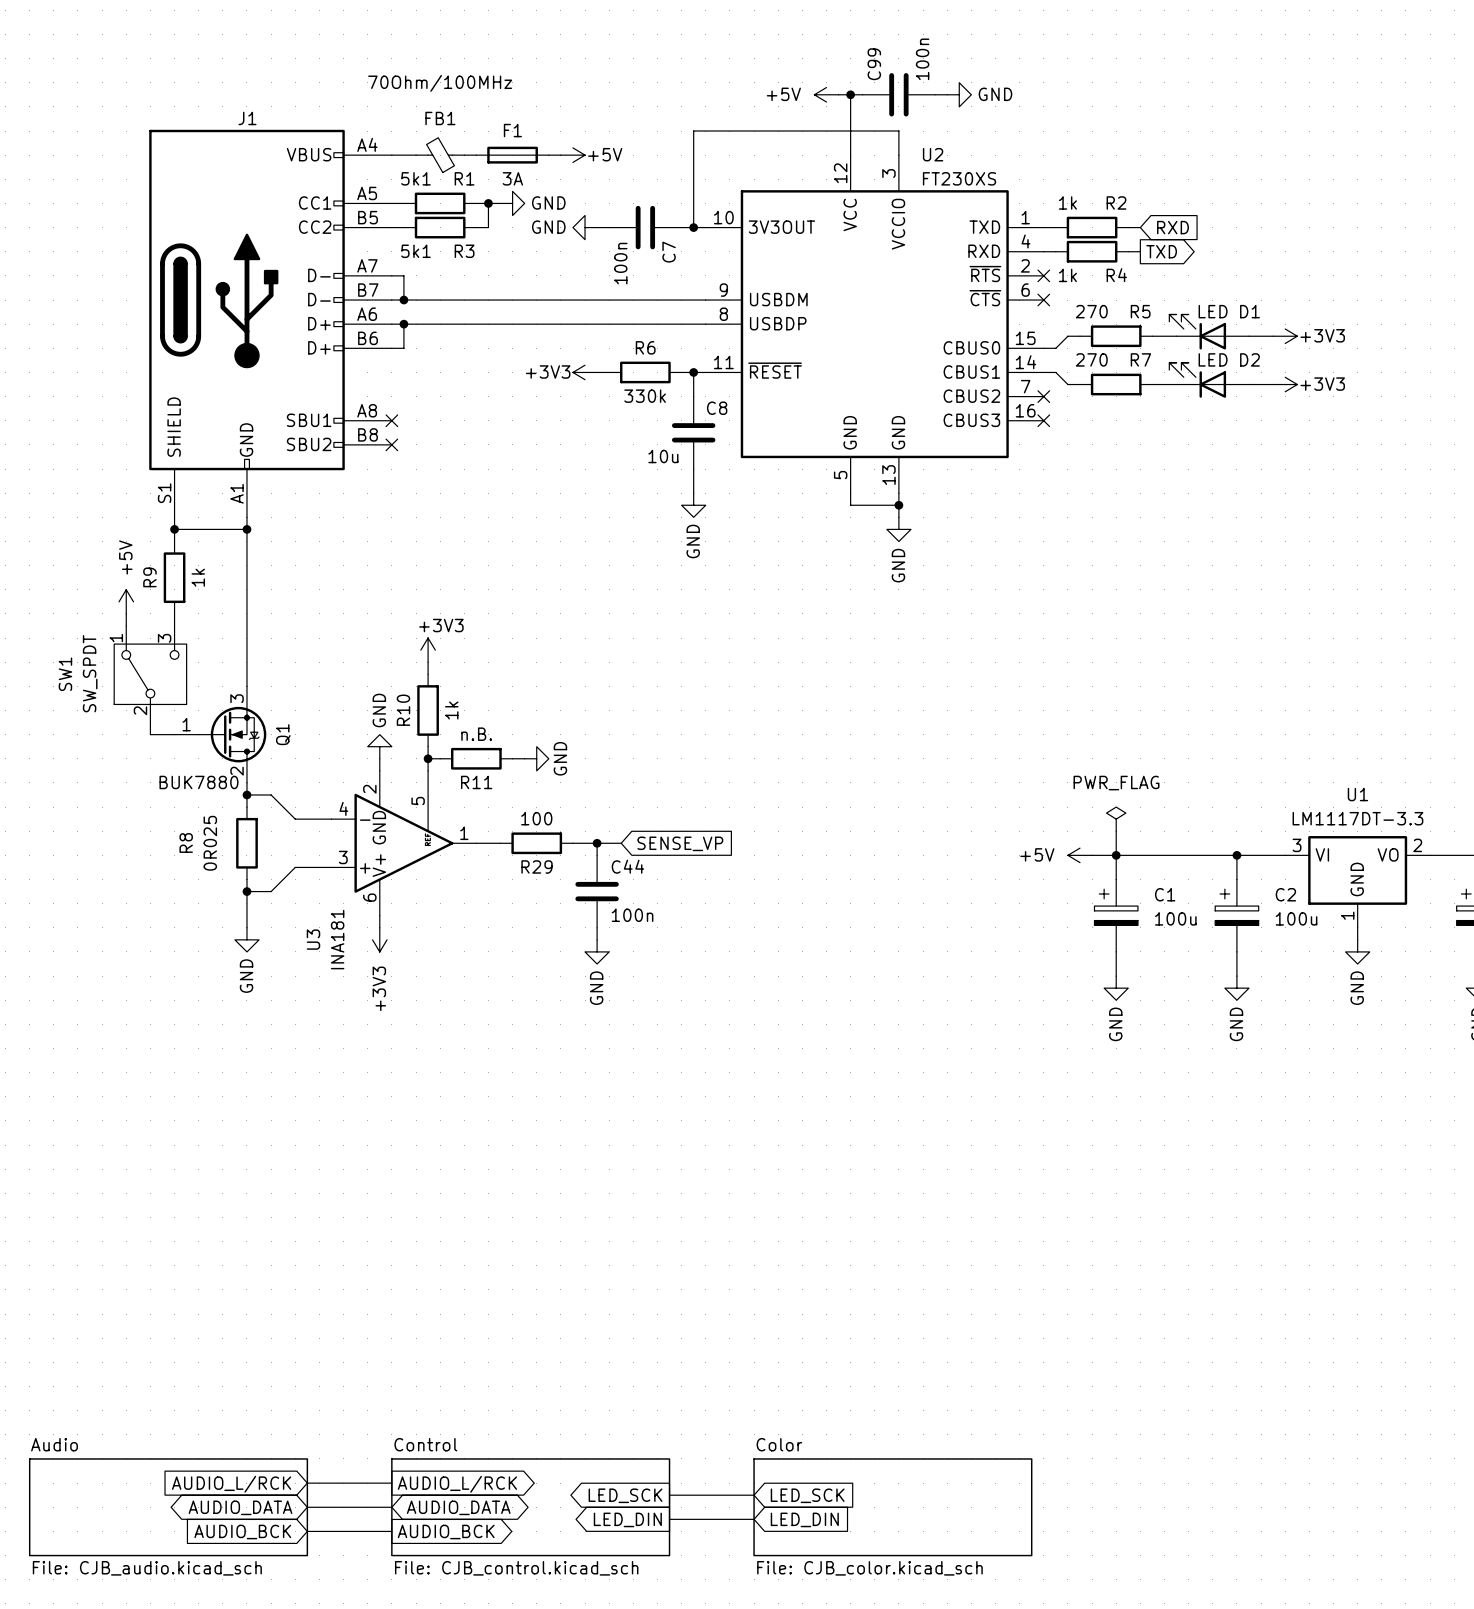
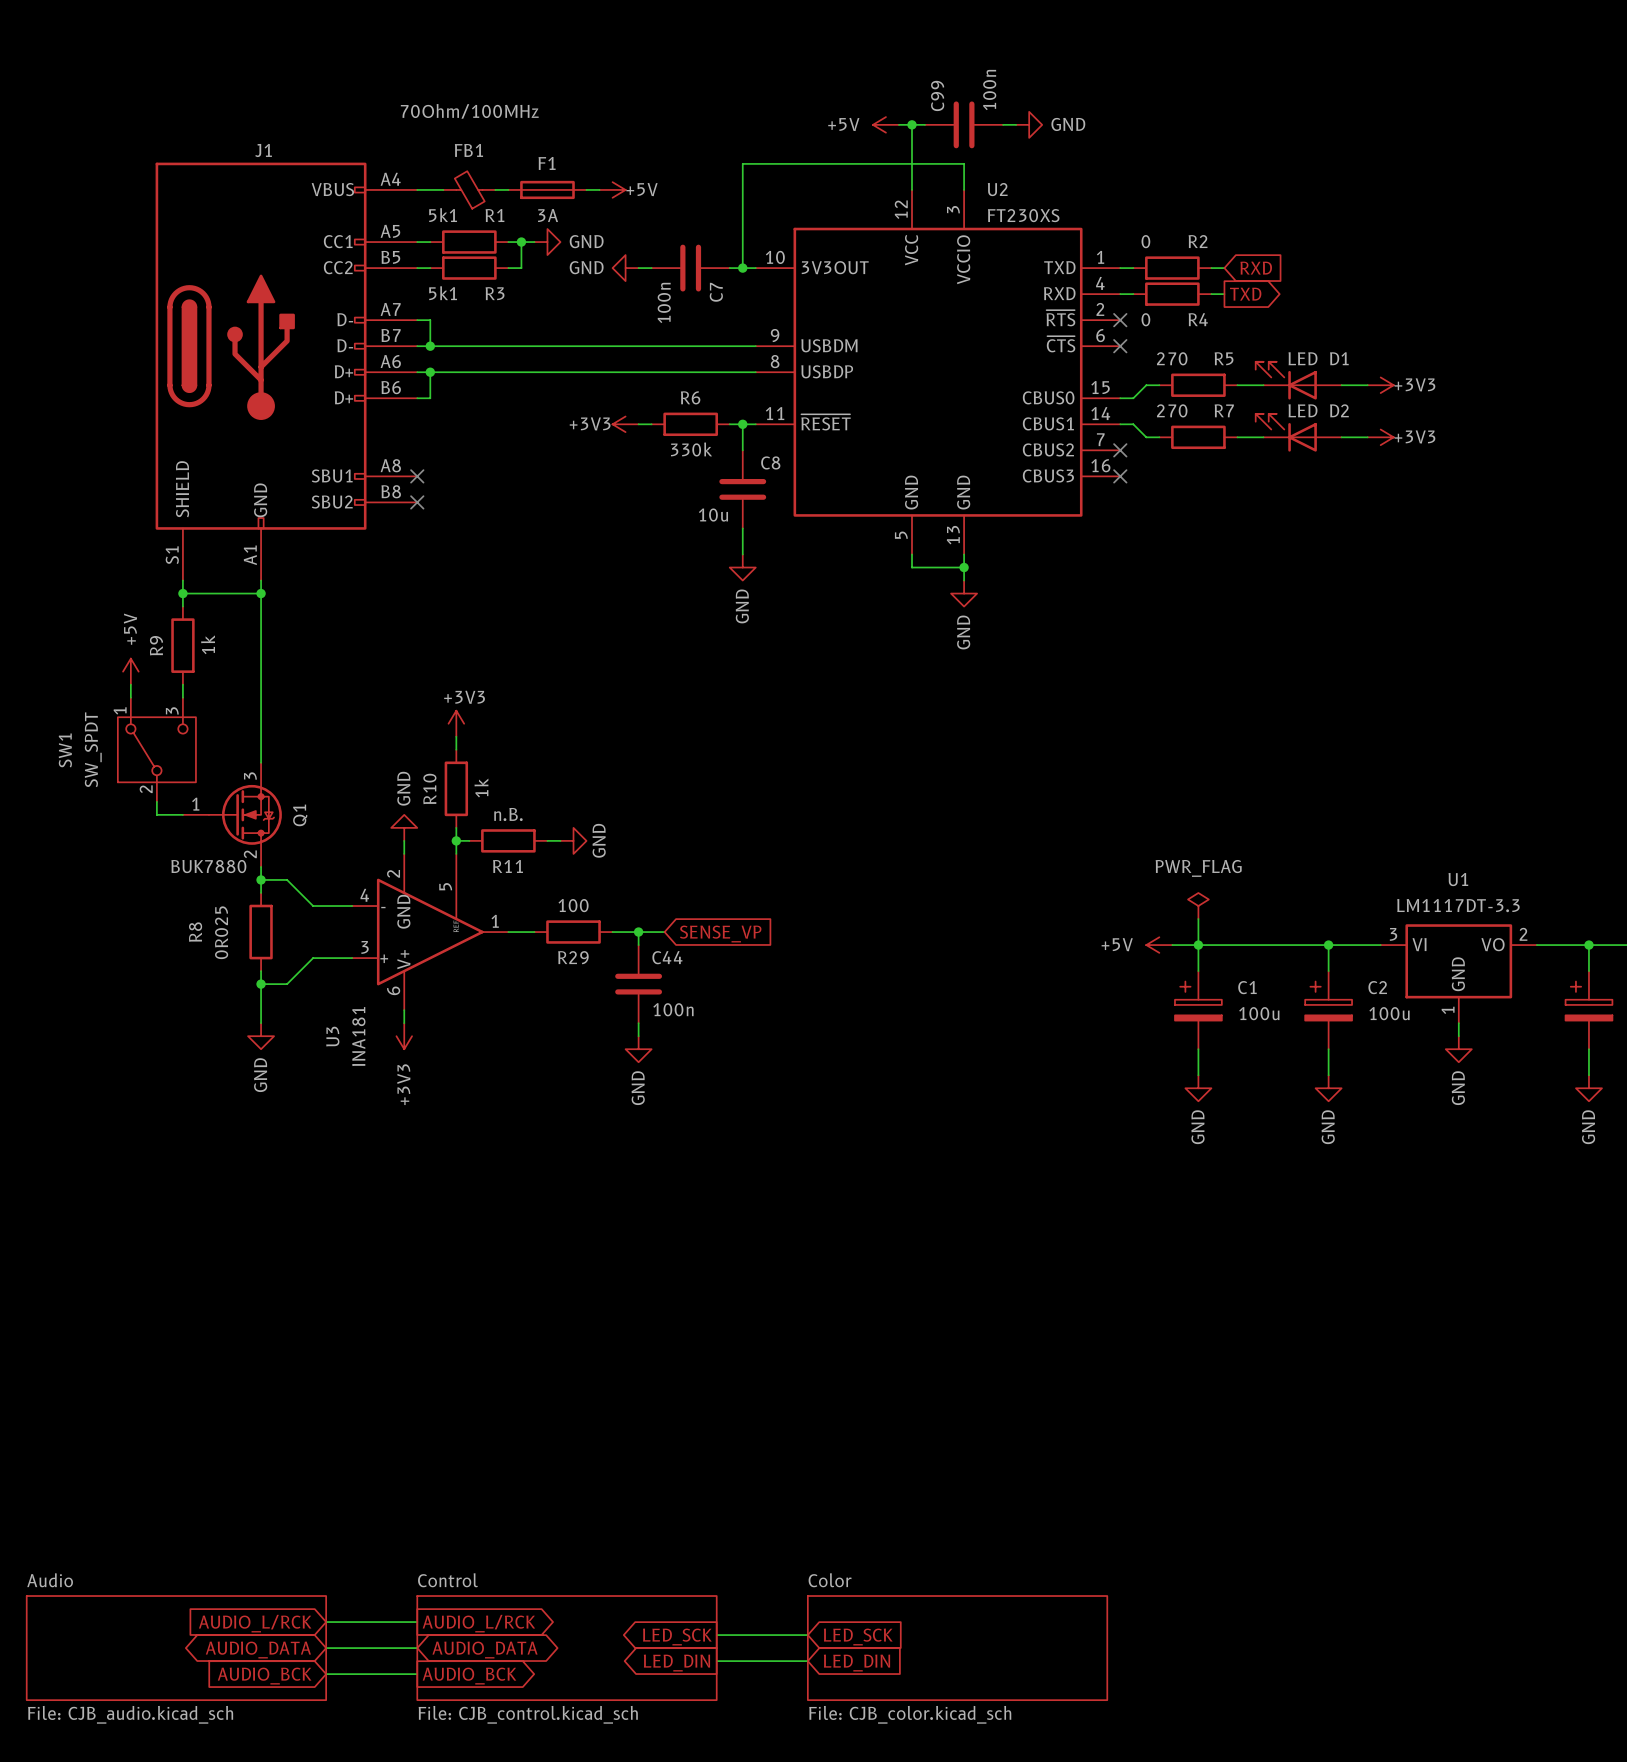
R2 value: 1k (1067, 202) -> 0 (1145, 241)
R4 value: 1k (1067, 275) -> 0 (1145, 319)

